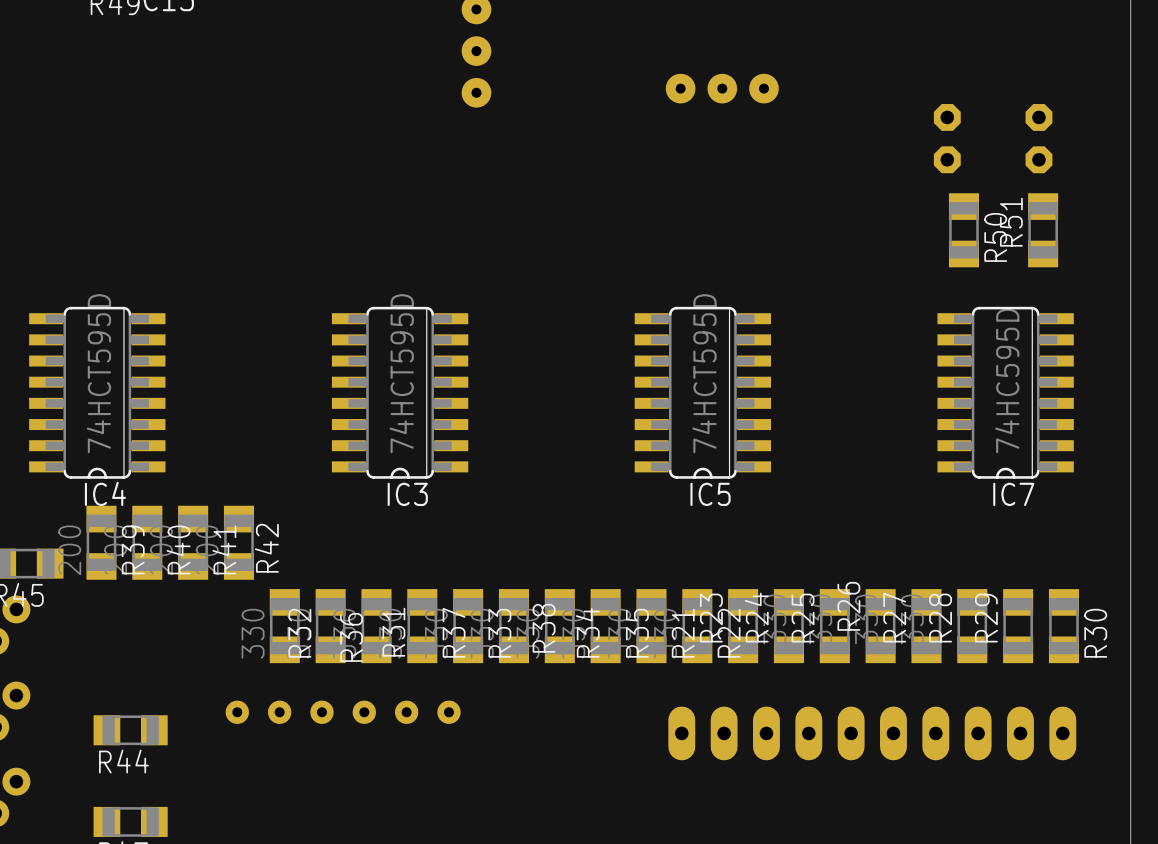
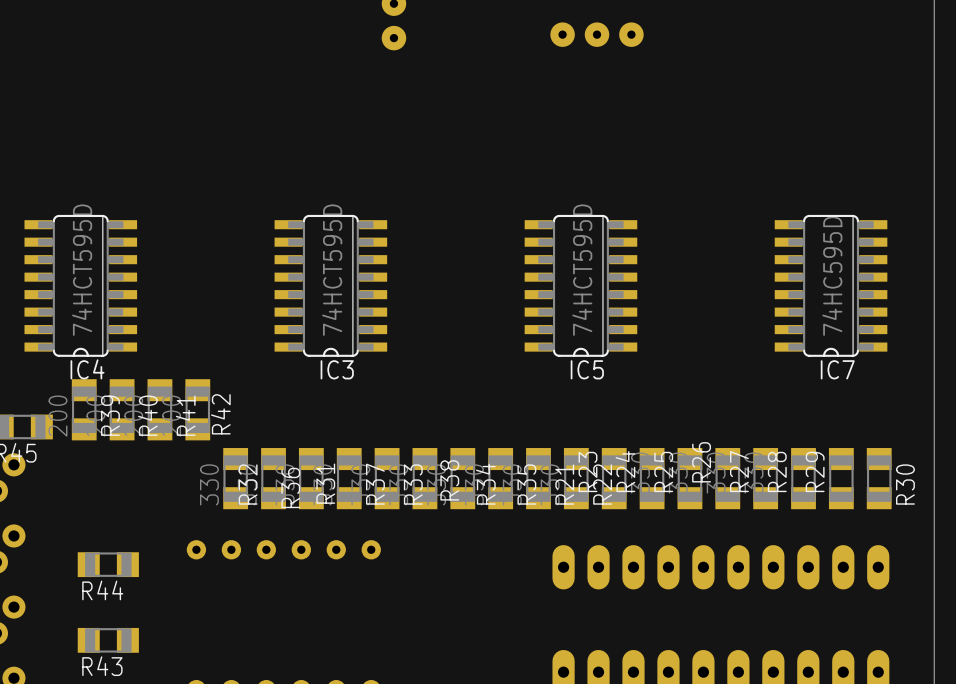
part: (947, 138) -> none
part: (1038, 138) -> none
R50: (963, 230) -> none
R51: (1043, 230) -> none

